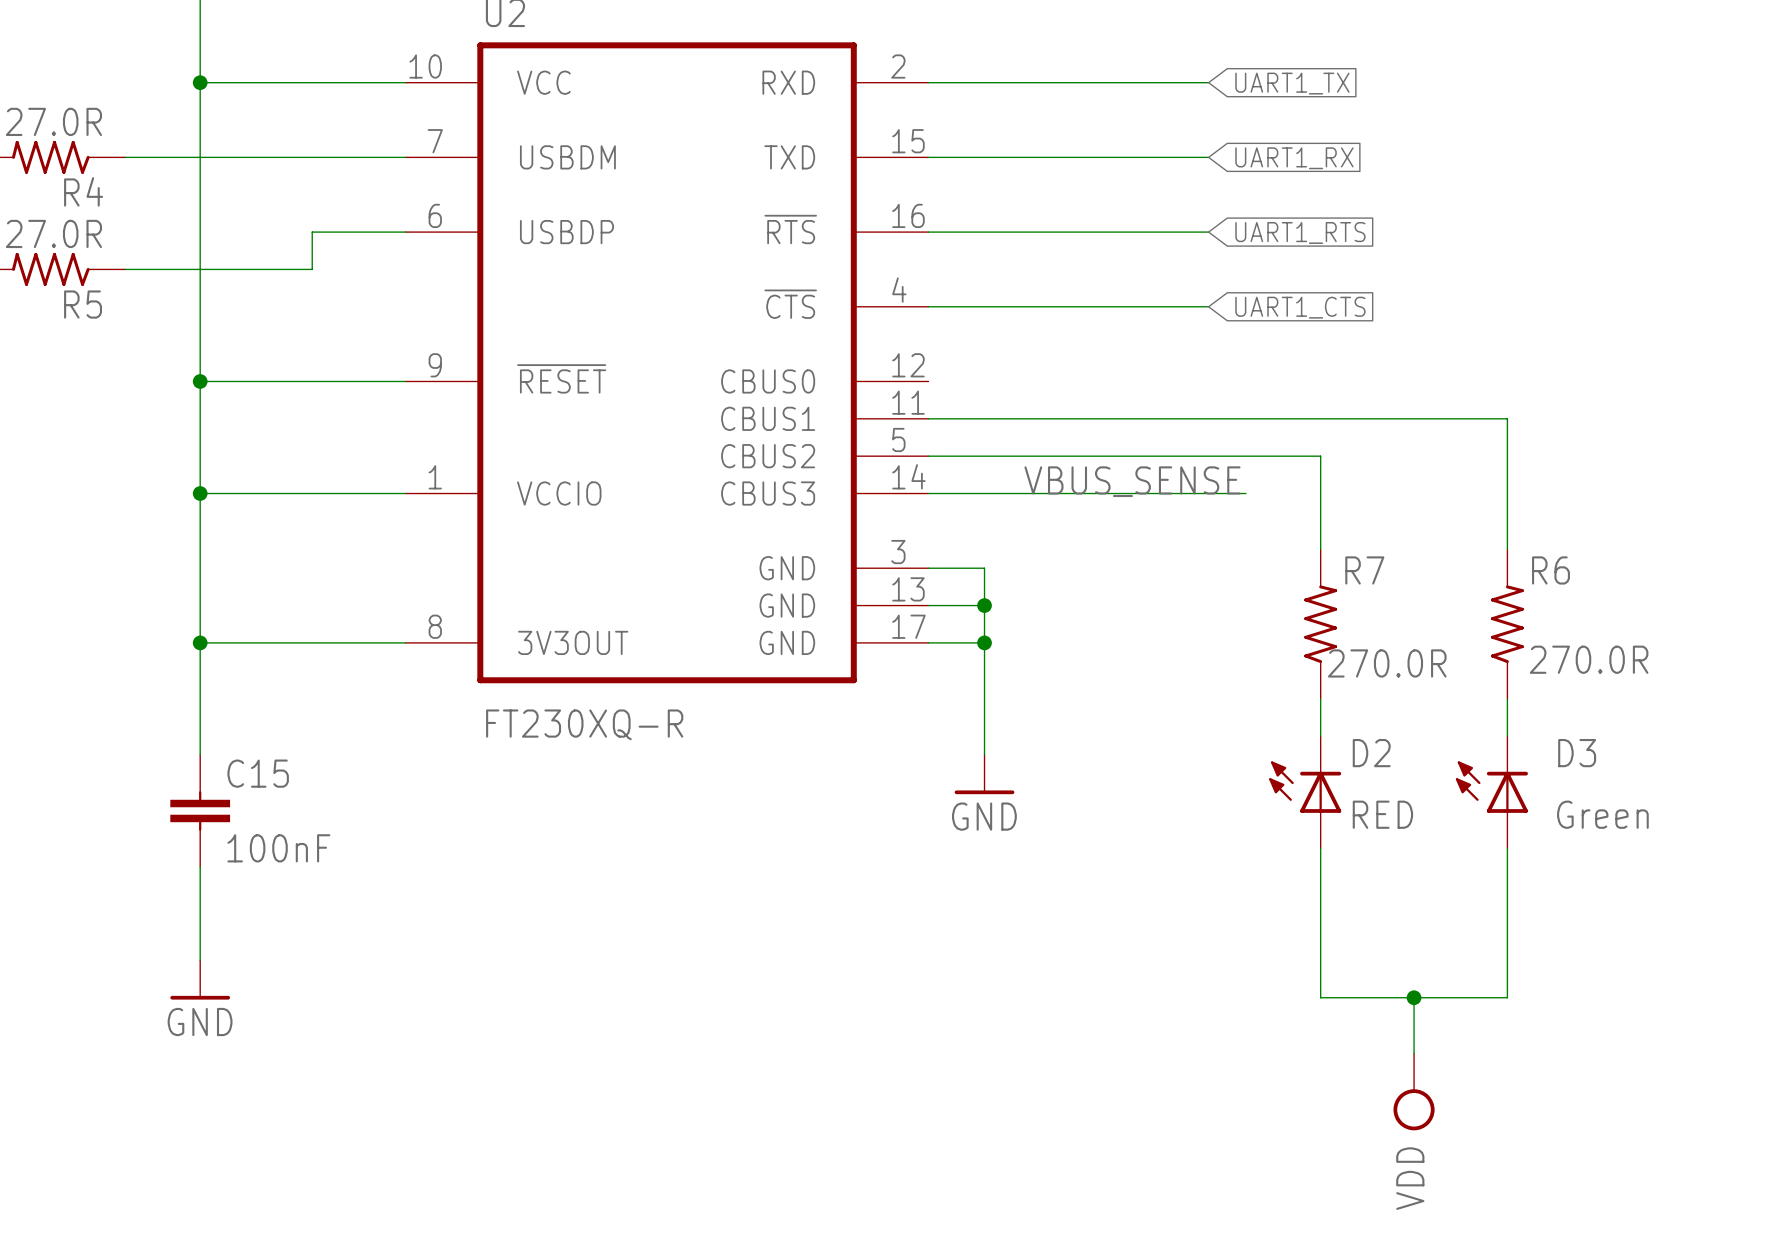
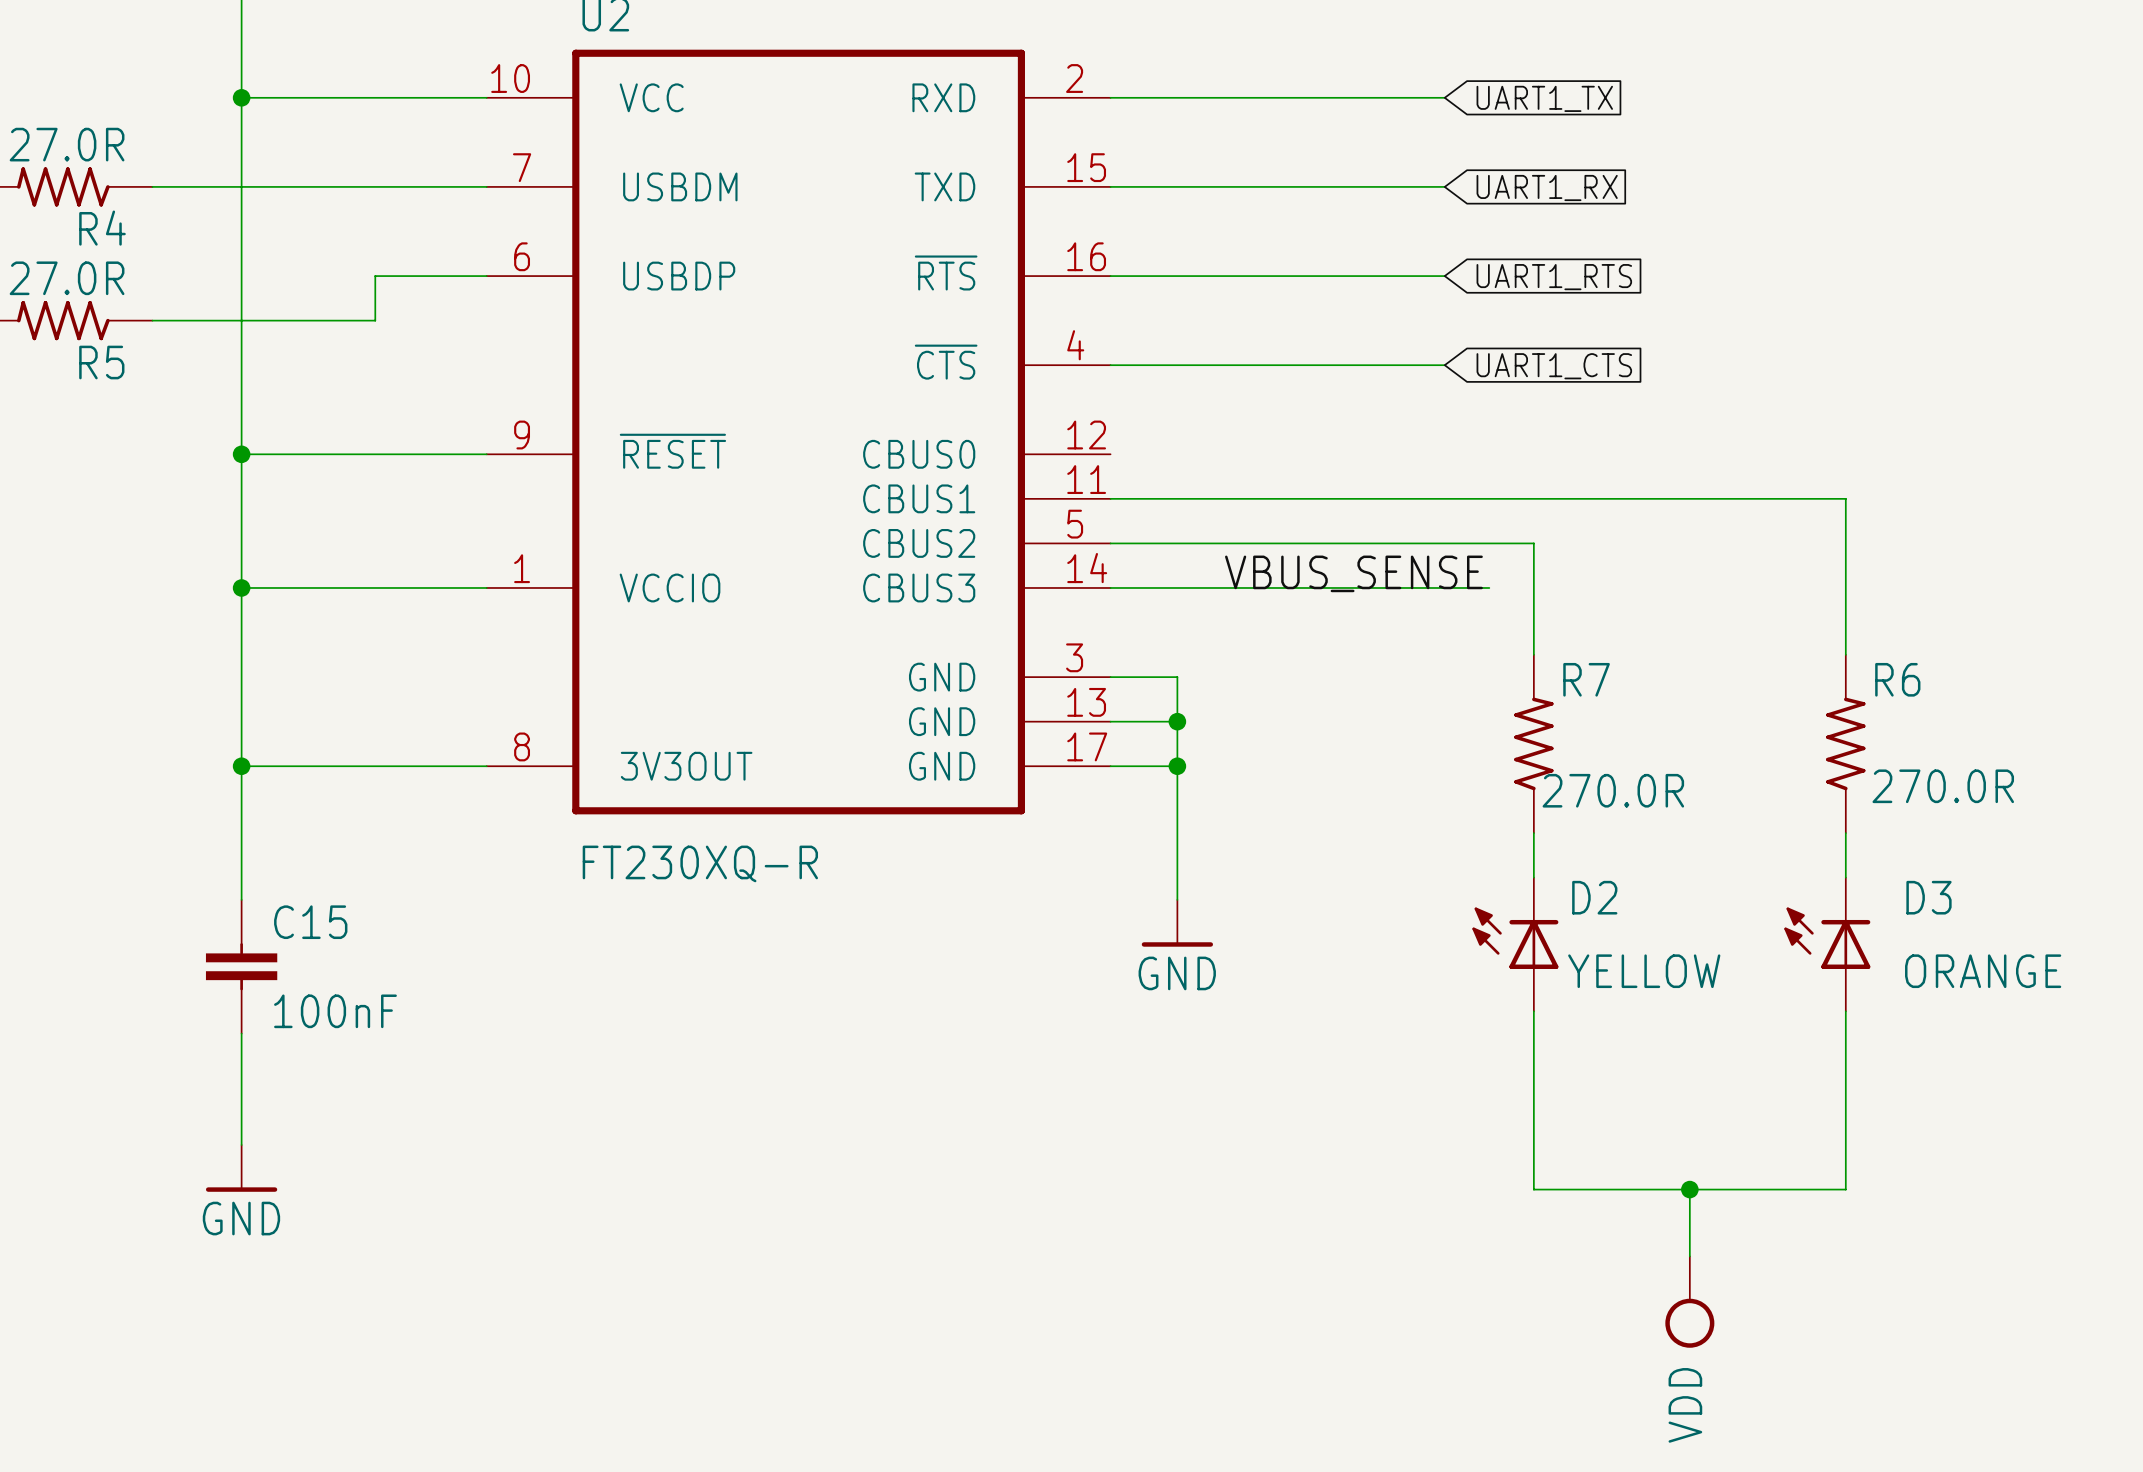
wire: (1507, 418) (1507, 549) -> (1801, 498) (1845, 498) (1845, 654)
wire: (1283, 456) (1320, 456) (1320, 549) -> (1533, 543) (1533, 654)
R7 position: (1320, 624) -> (1533, 743)
R6 position: (1507, 624) -> (1845, 743)
wire: (1320, 698) (1320, 736) -> (1533, 833) (1533, 877)
wire: (1507, 698) (1507, 736) -> (1845, 833) (1845, 877)
D2 position: (1305, 792) -> (1515, 944)
D3 position: (1491, 792) -> (1827, 944)
D2 value: RED (1382, 814) -> YELLOW (1644, 971)
D3 value: Green (1602, 814) -> ORANGE (1983, 971)
wire: (1320, 848) (1320, 997) -> (1533, 1011) (1533, 1189) (1578, 1189)
wire: (1507, 848) (1507, 997) -> (1845, 1011) (1845, 1189) (1801, 1189)

